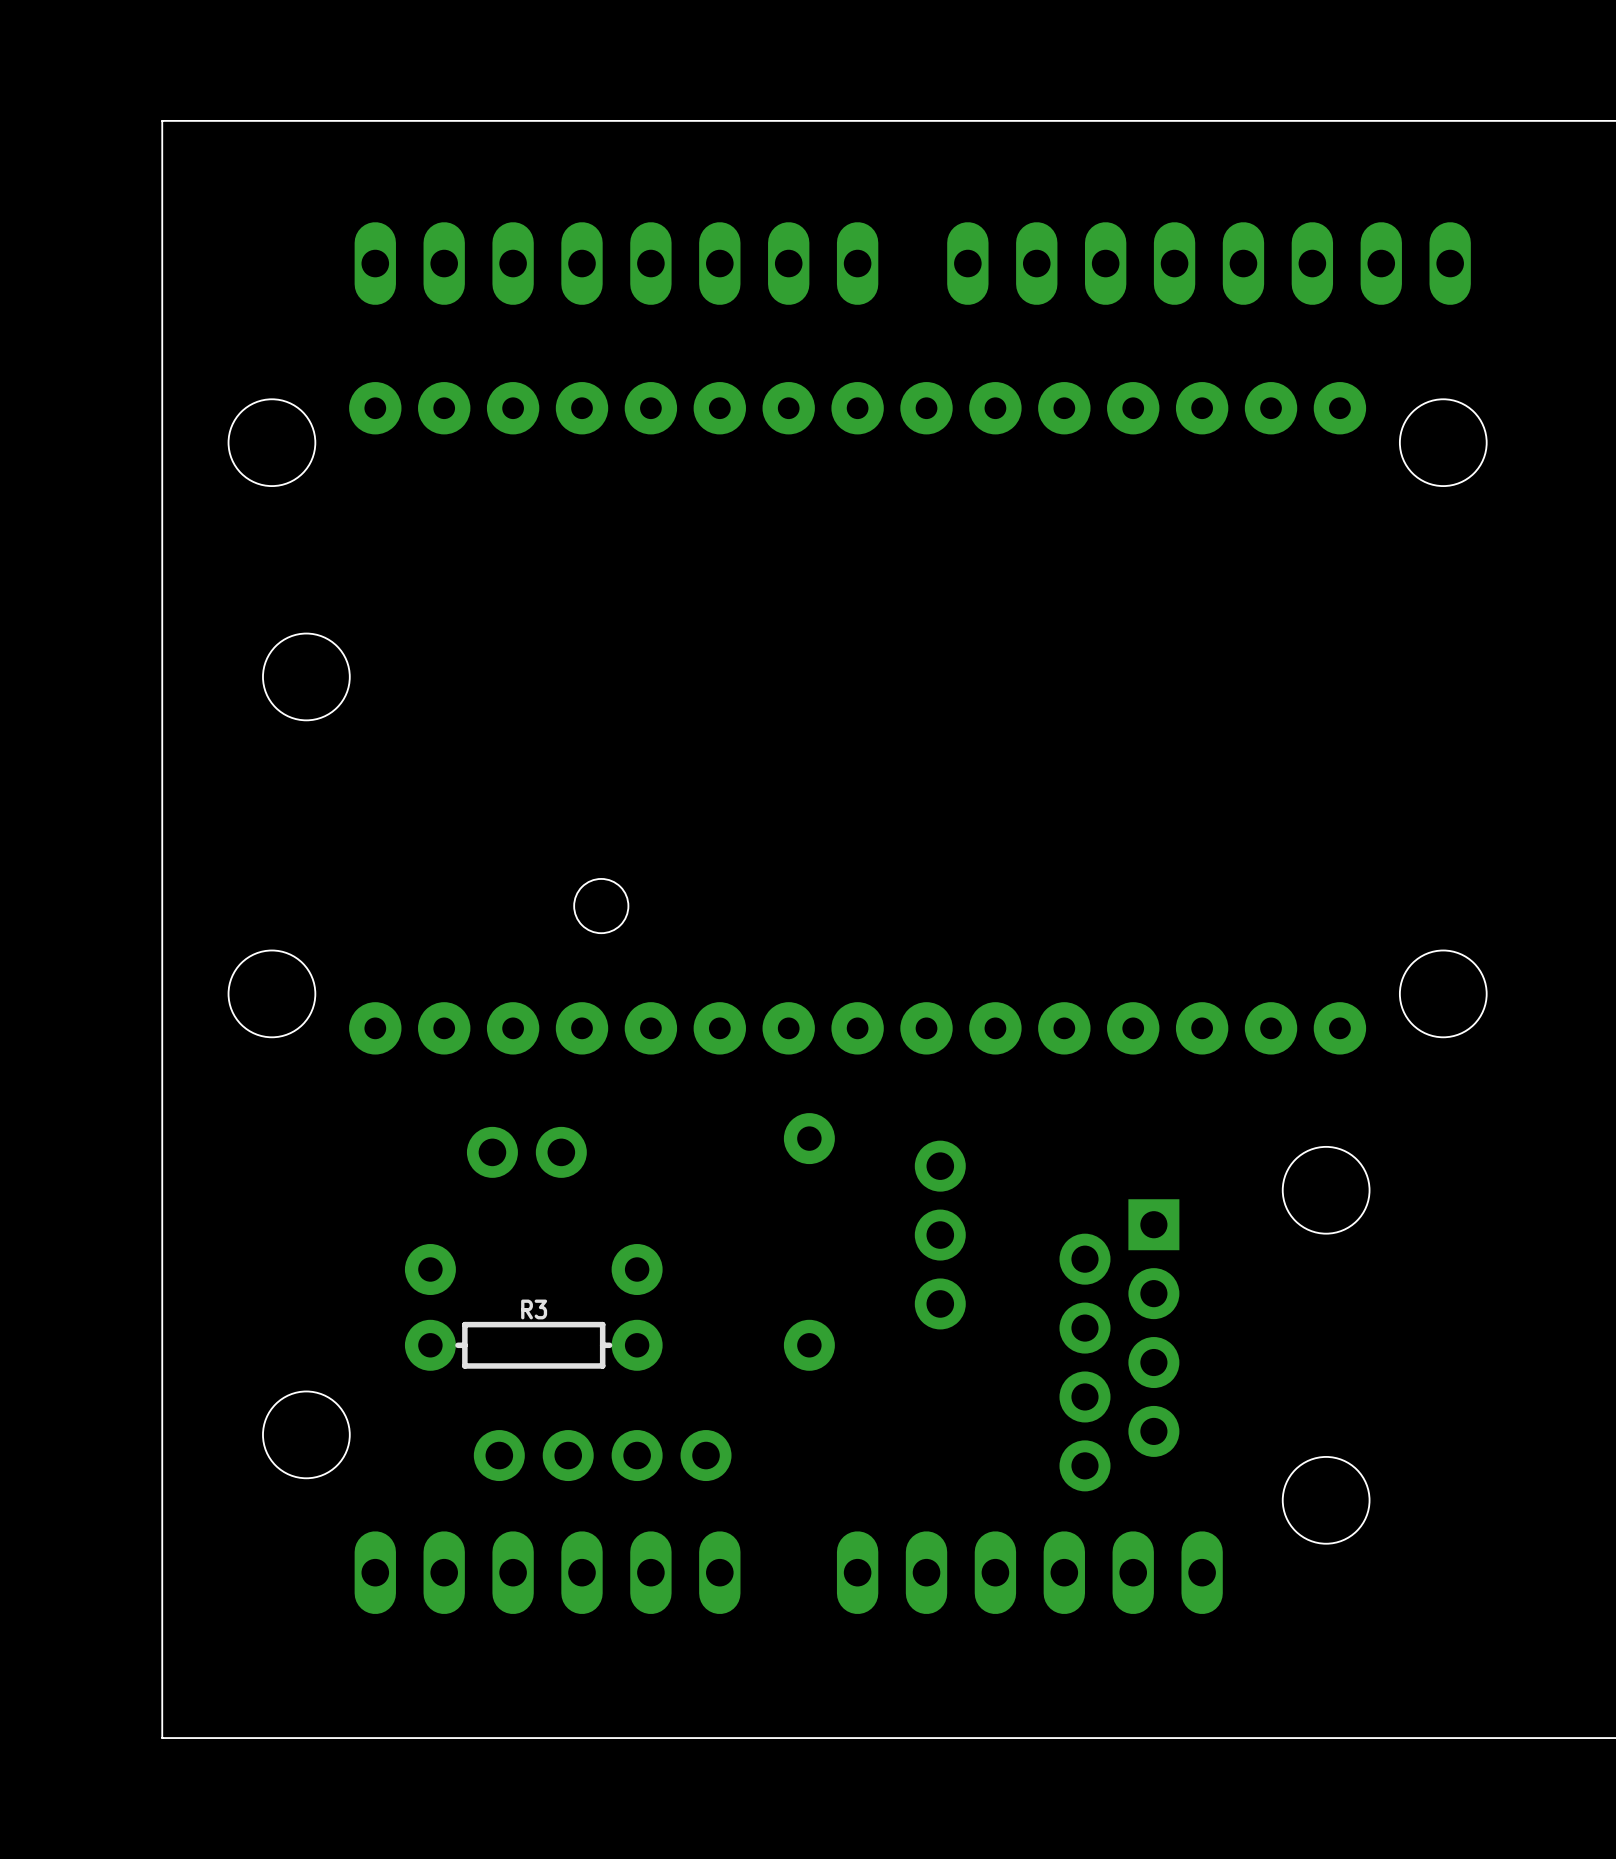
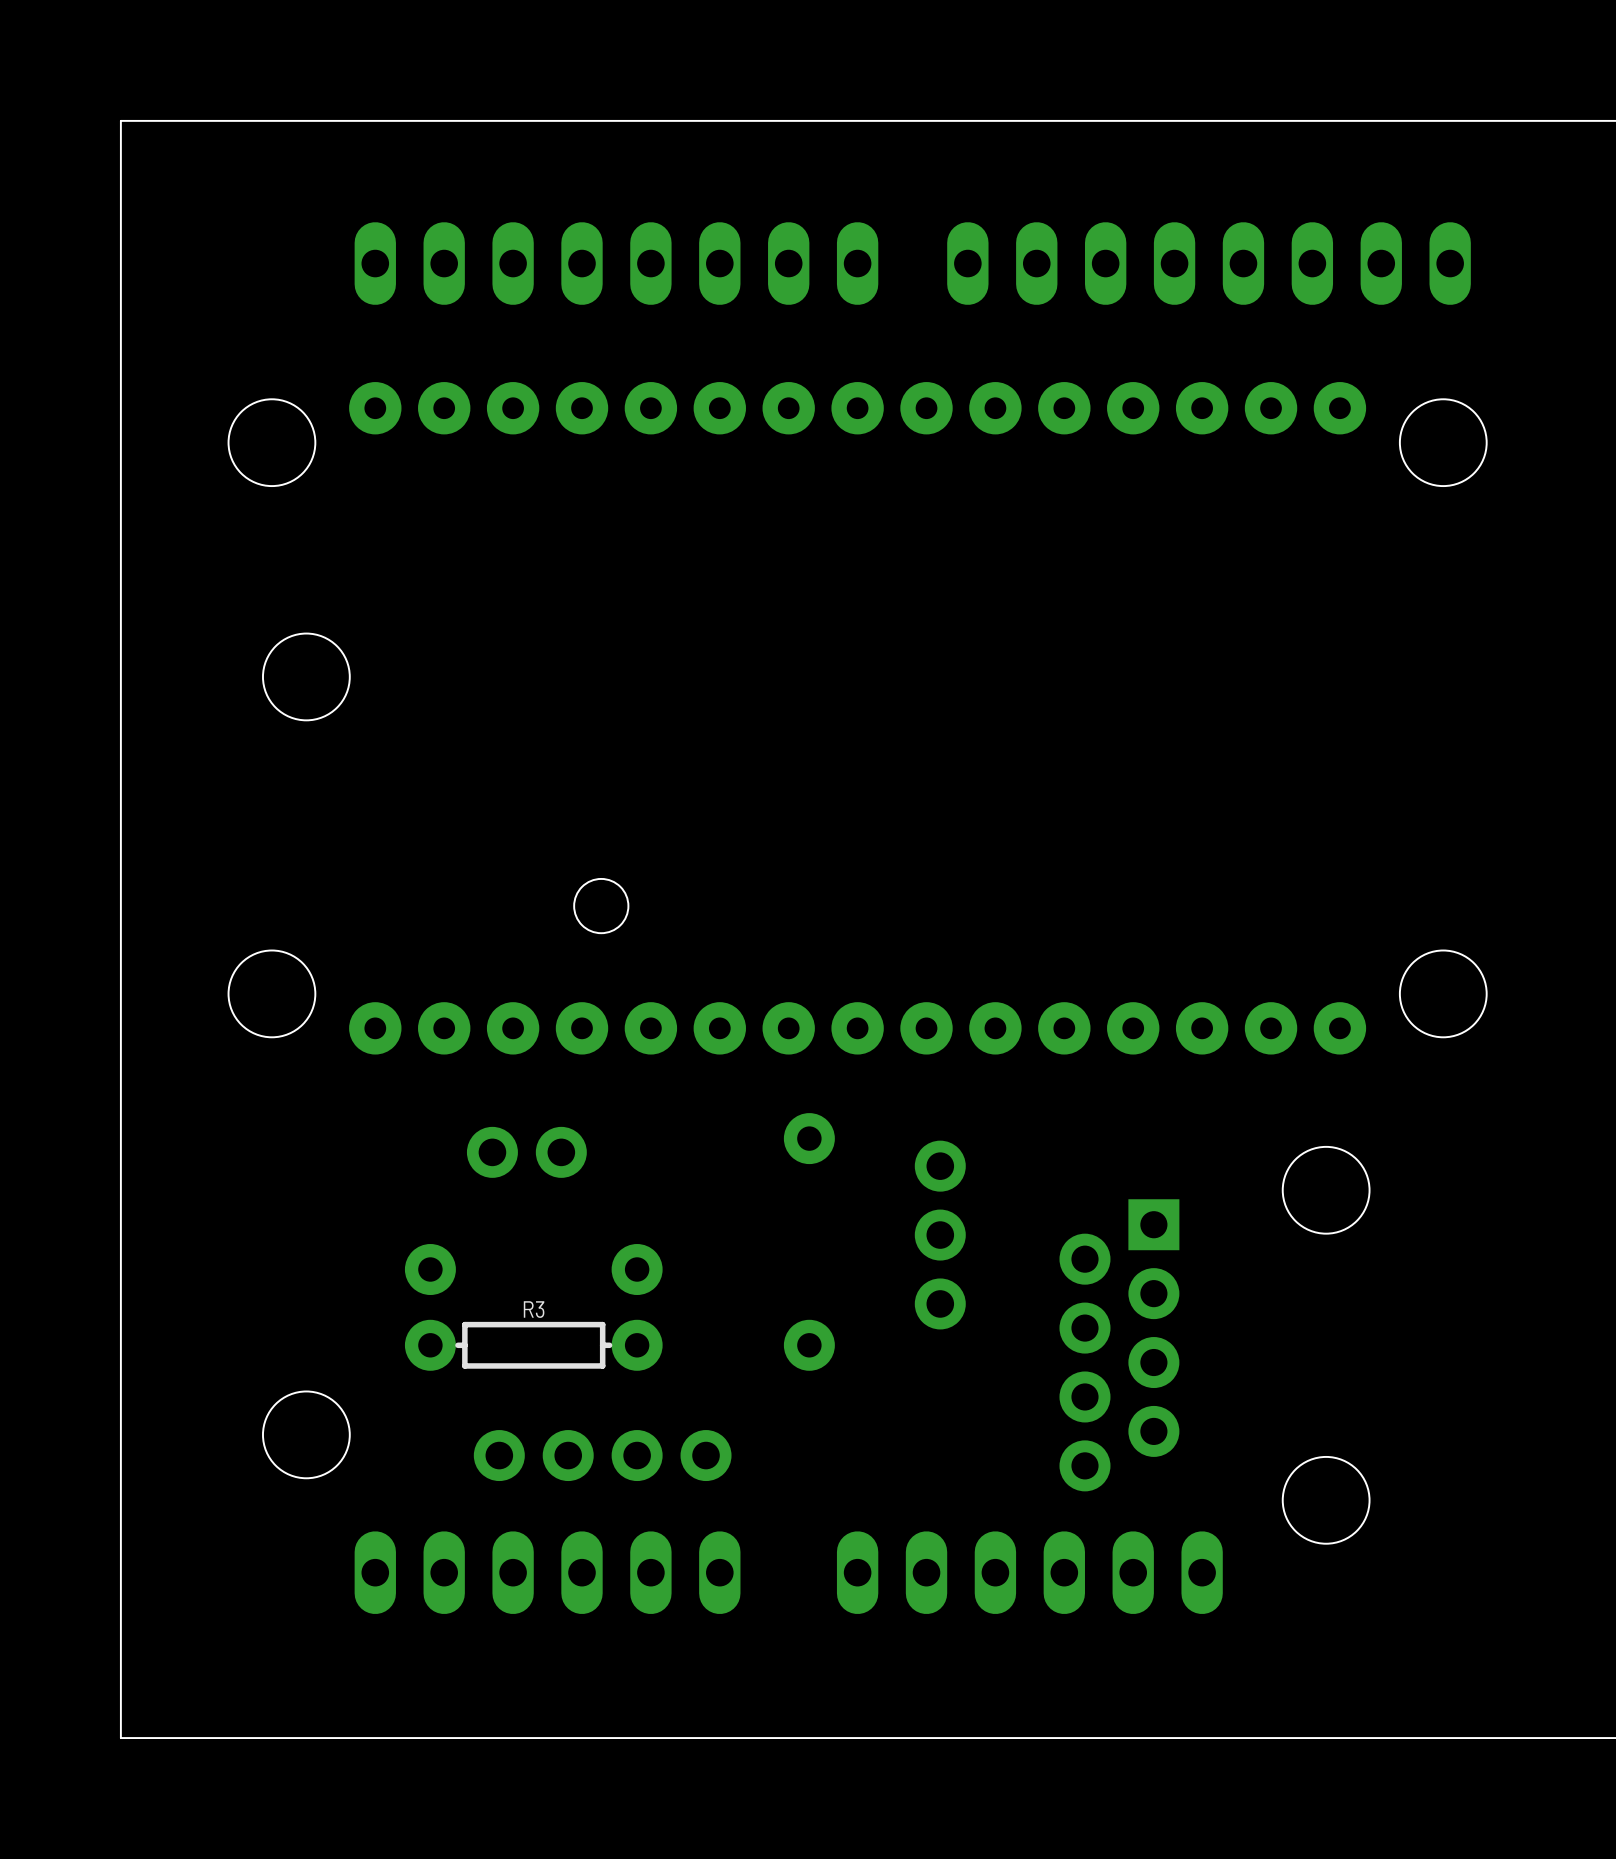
board edge: (162, 120) (162, 1738) -> (162, 120) (120, 120) (120, 1738) (162, 1738)

